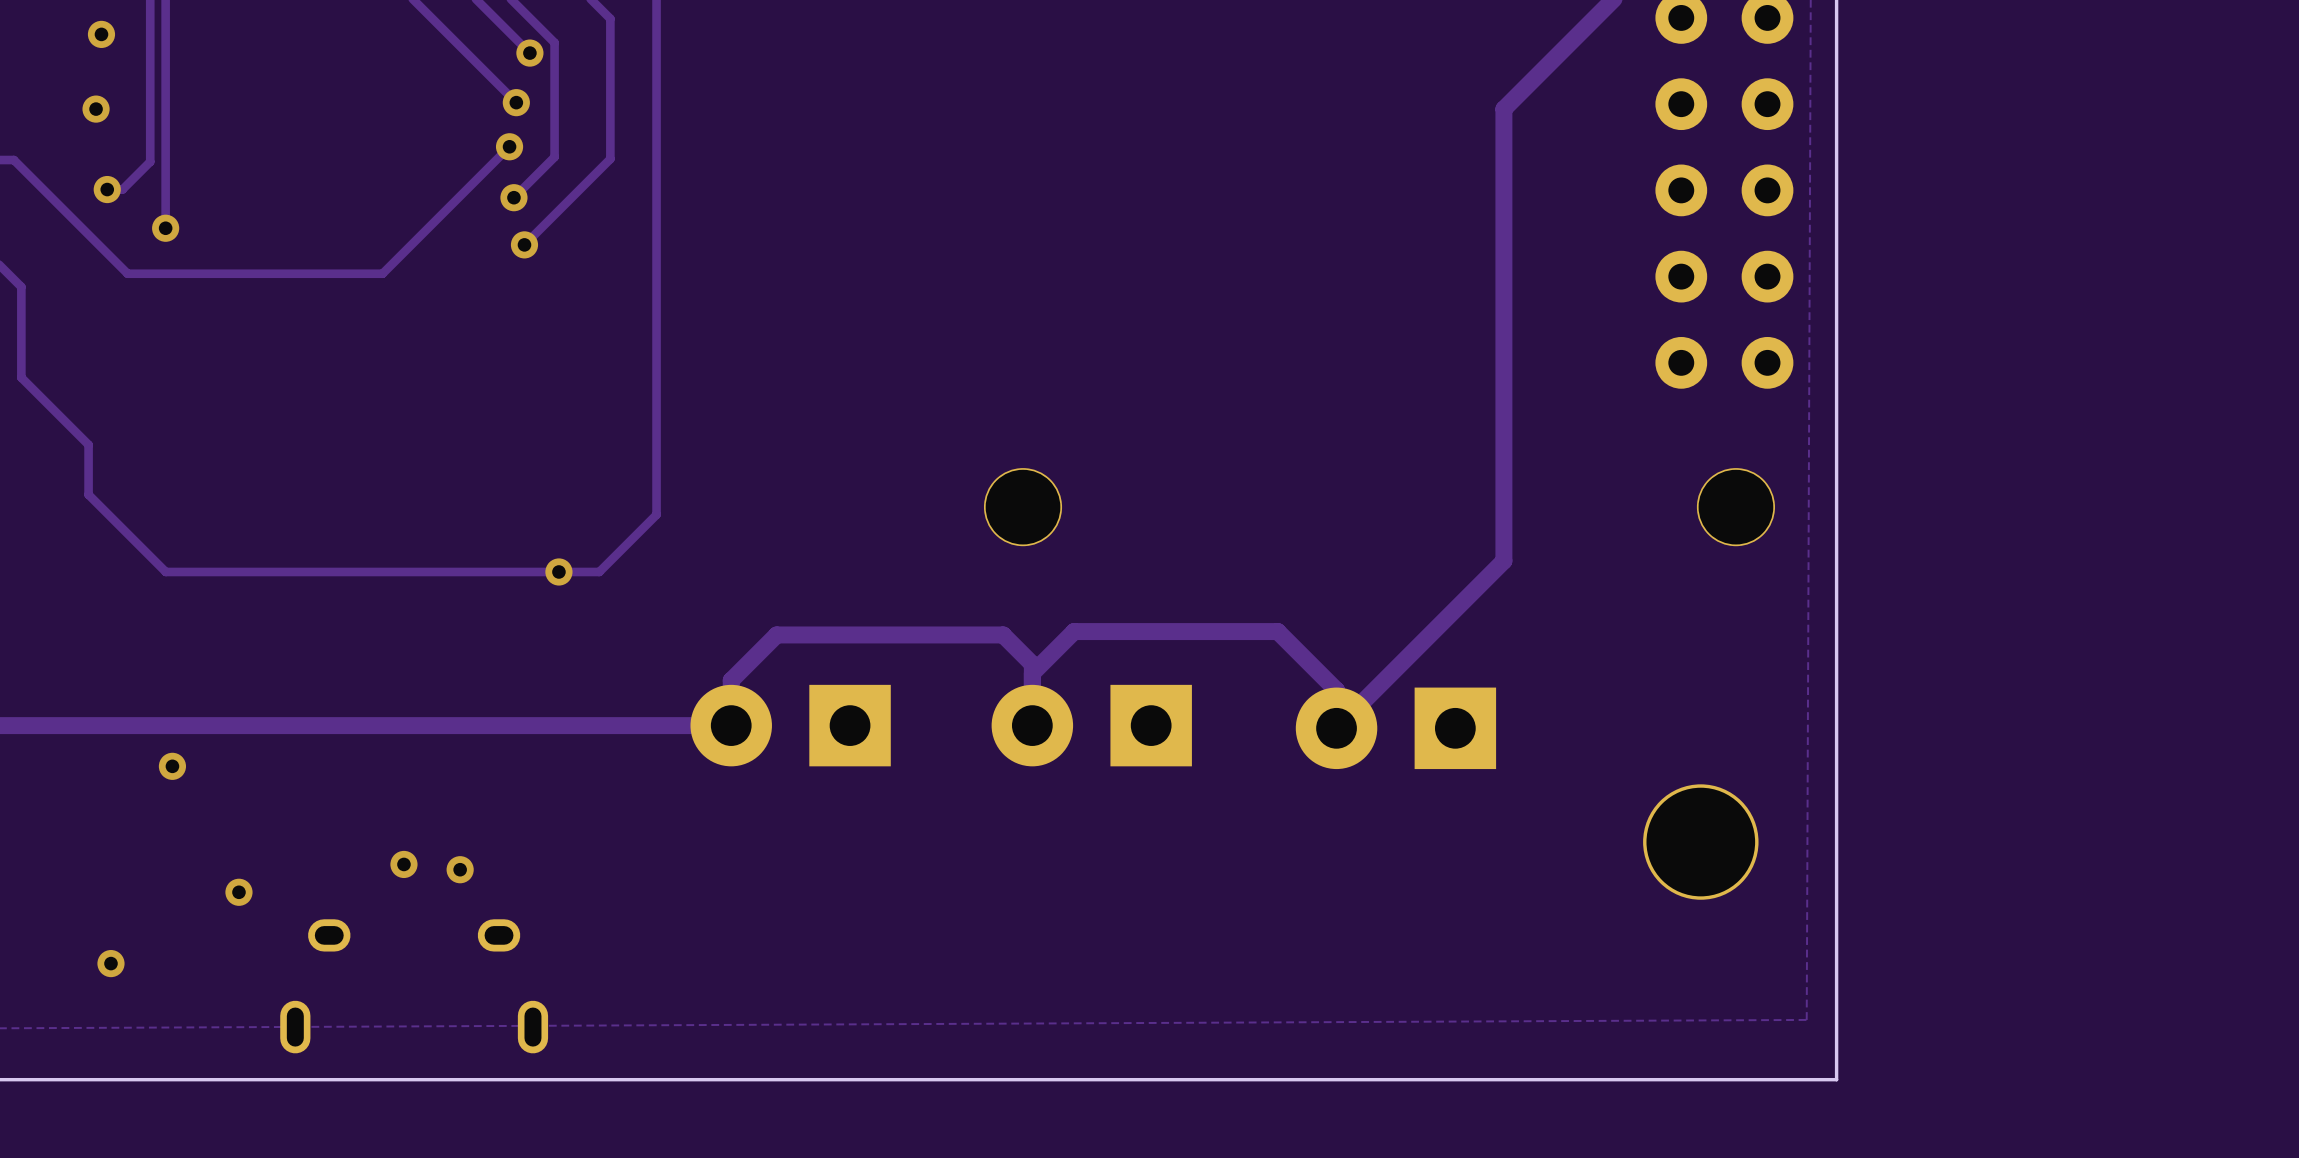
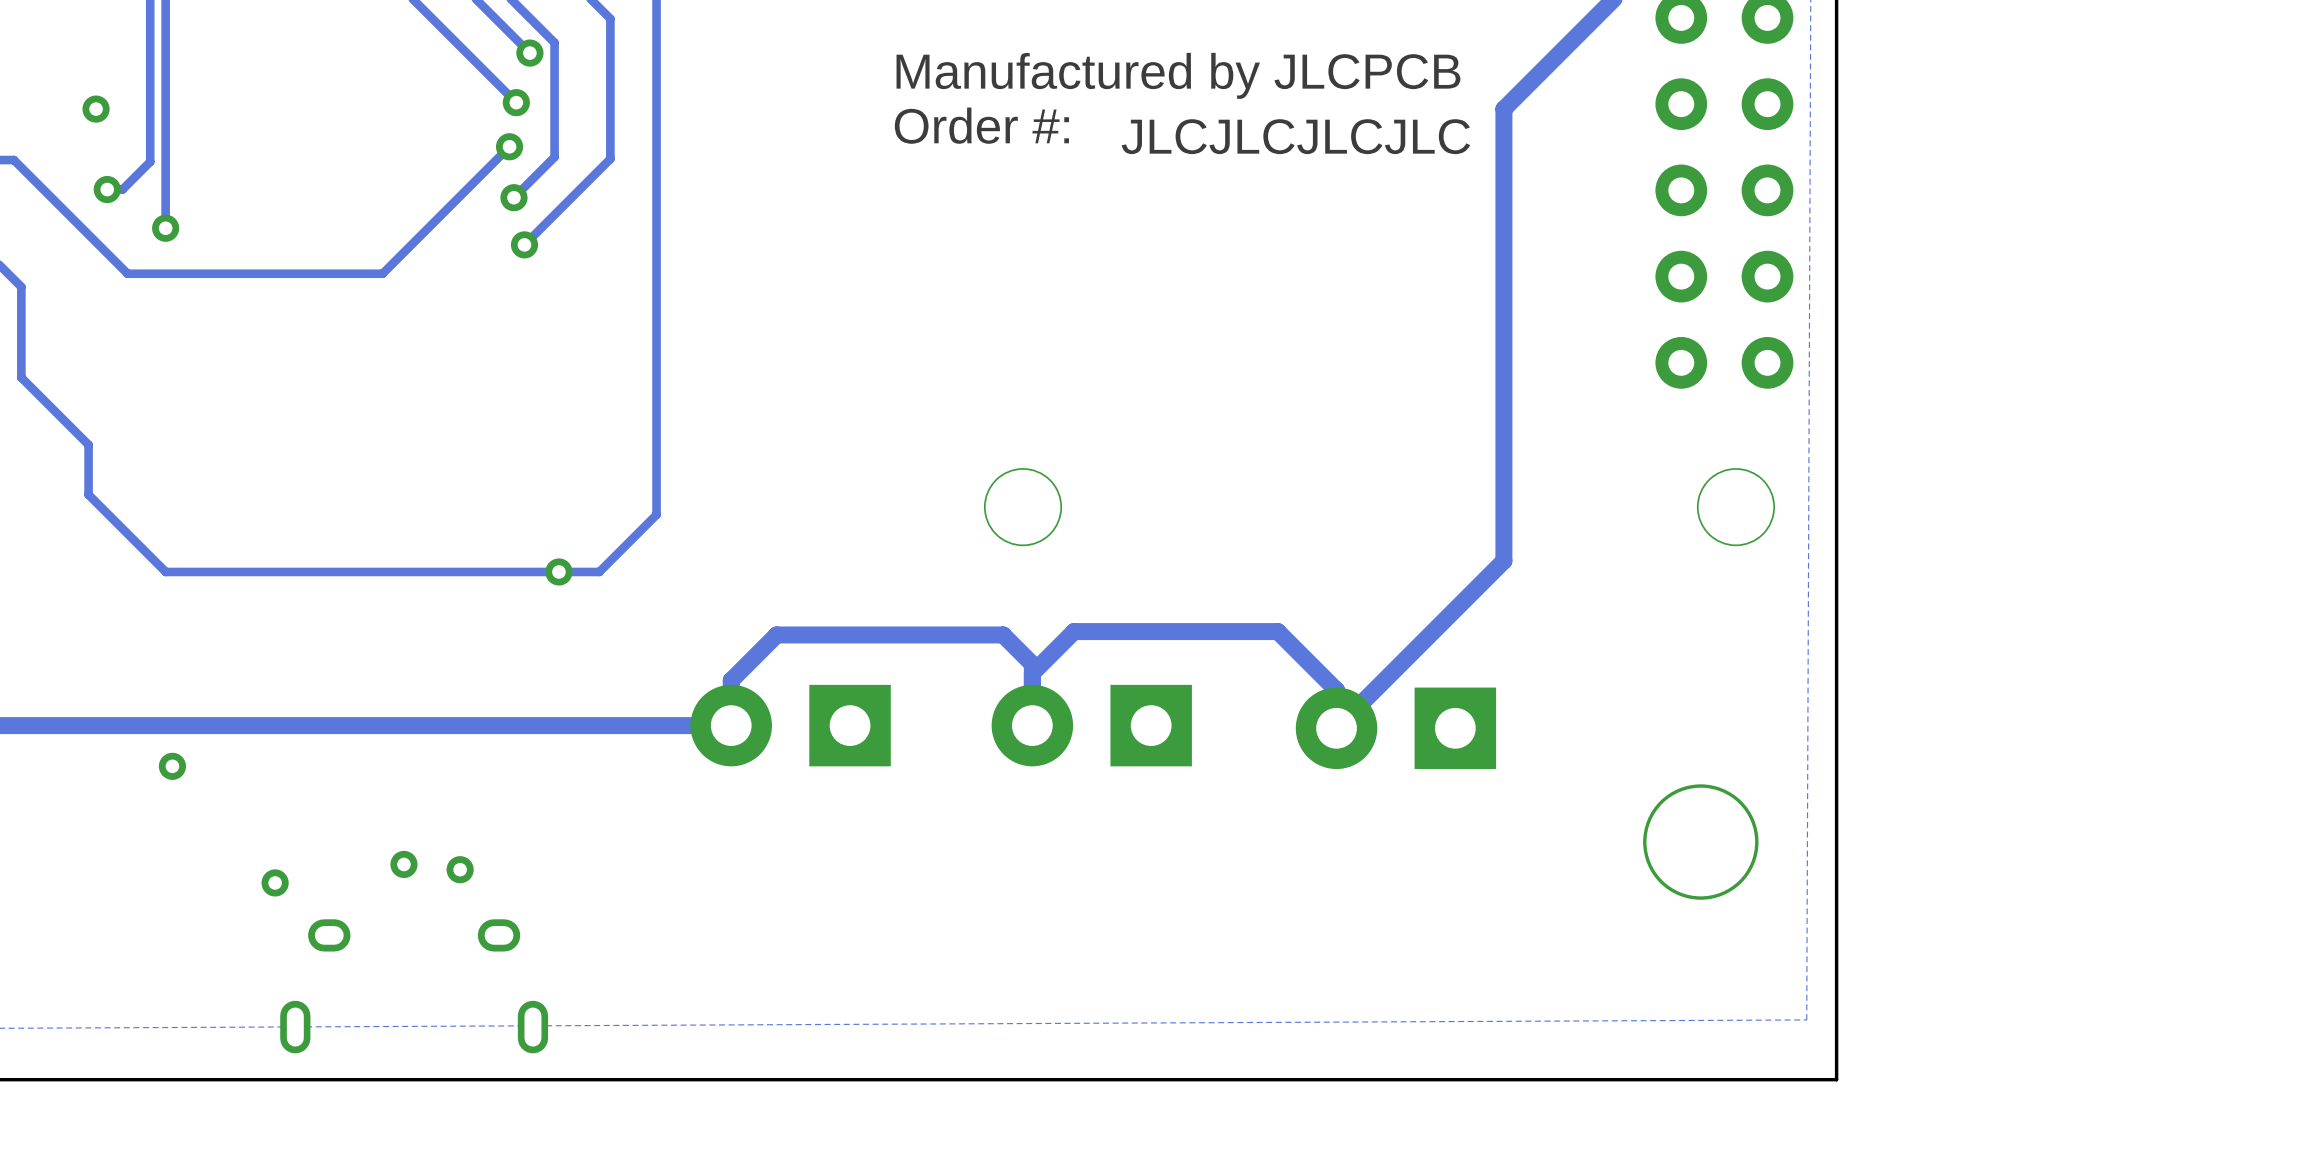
via: (101, 34) -> none
text: none -> Manufactured by JLCPCB (1178, 75)
text: none -> Order #: (981, 125)
text: none -> JLCJLCJLCJLC (1295, 136)
via position: (238, 892) -> (275, 882)
via: (110, 963) -> none

